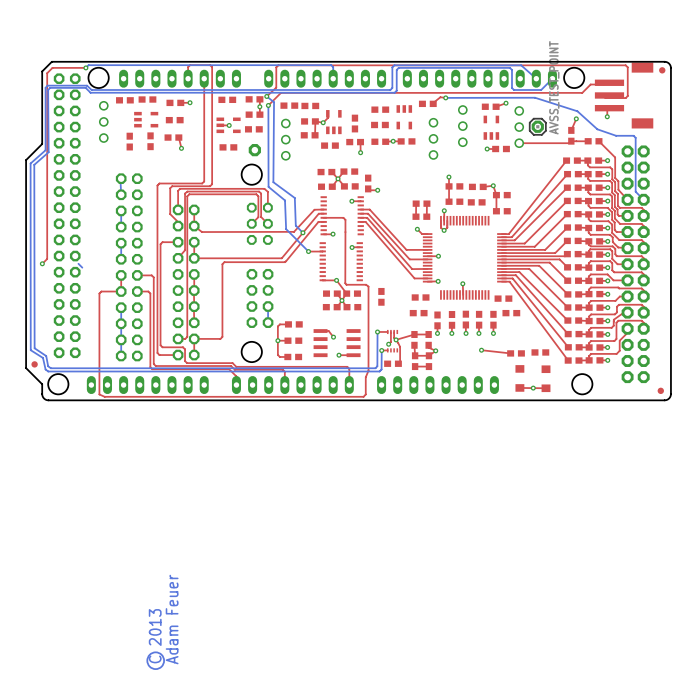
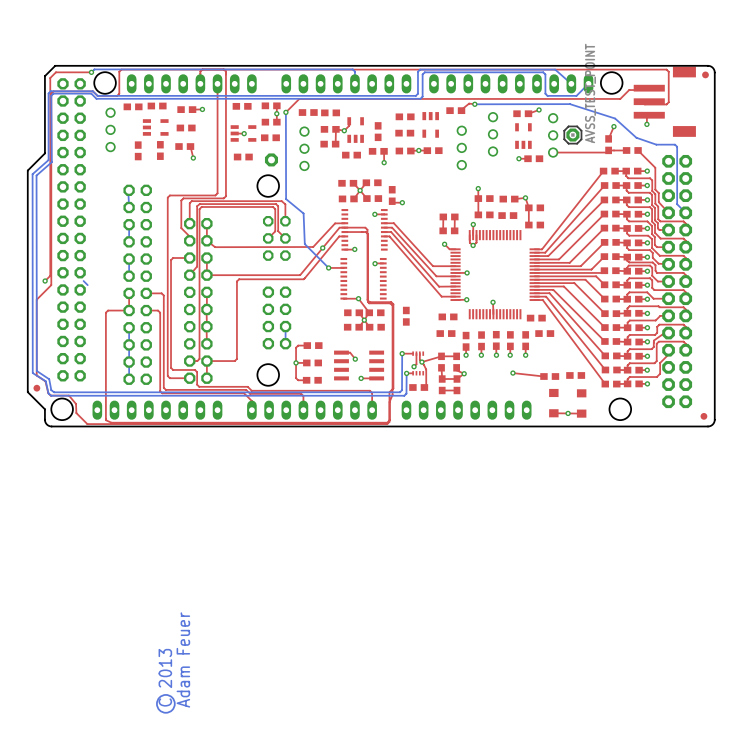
top track: (278, 65) (276, 67) (276, 87) (266, 96) -> (296, 69) (121, 69) (119, 71) (119, 93) (117, 95) (97, 95) (93, 91) (53, 91) (51, 93) (51, 285) (36, 299) (36, 375) (45, 381) (50, 395) (68, 395) (76, 403) (76, 413) (87, 424) (387, 424) (389, 421) (389, 392) (393, 388) (393, 304) (391, 302) (369, 302) (367, 299) (367, 229) (365, 227) (344, 227)
bottom track: (266, 96) (274, 102) (273, 182) (294, 198) (295, 225) (302, 232) -> none
via: (266, 96) -> none

